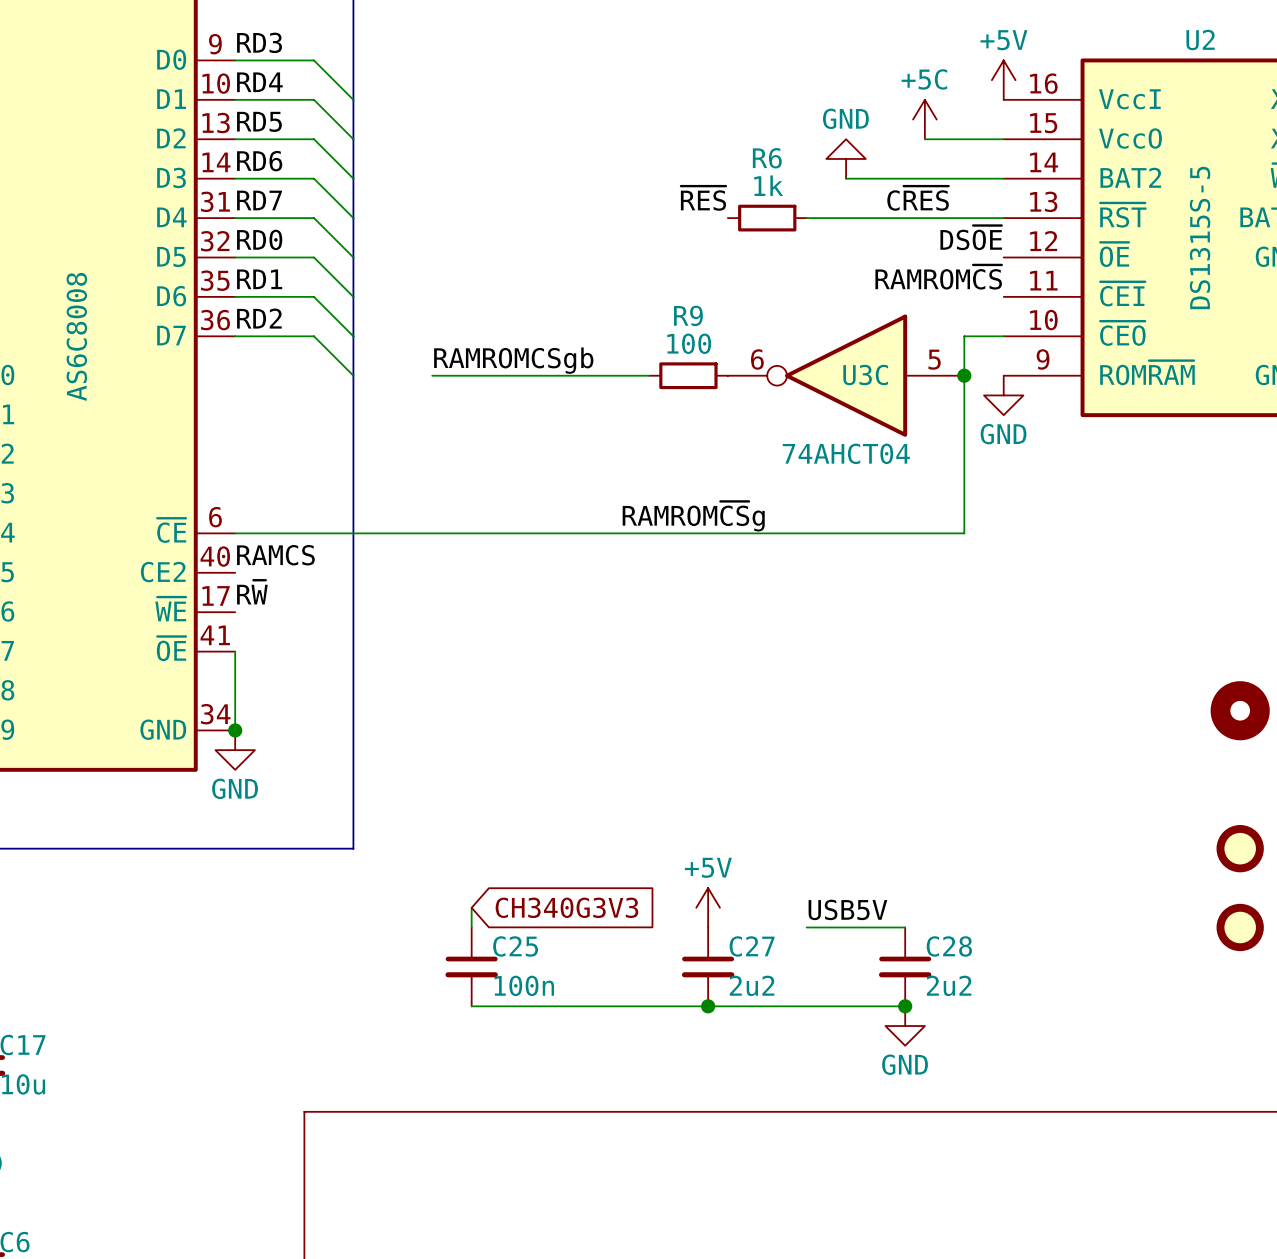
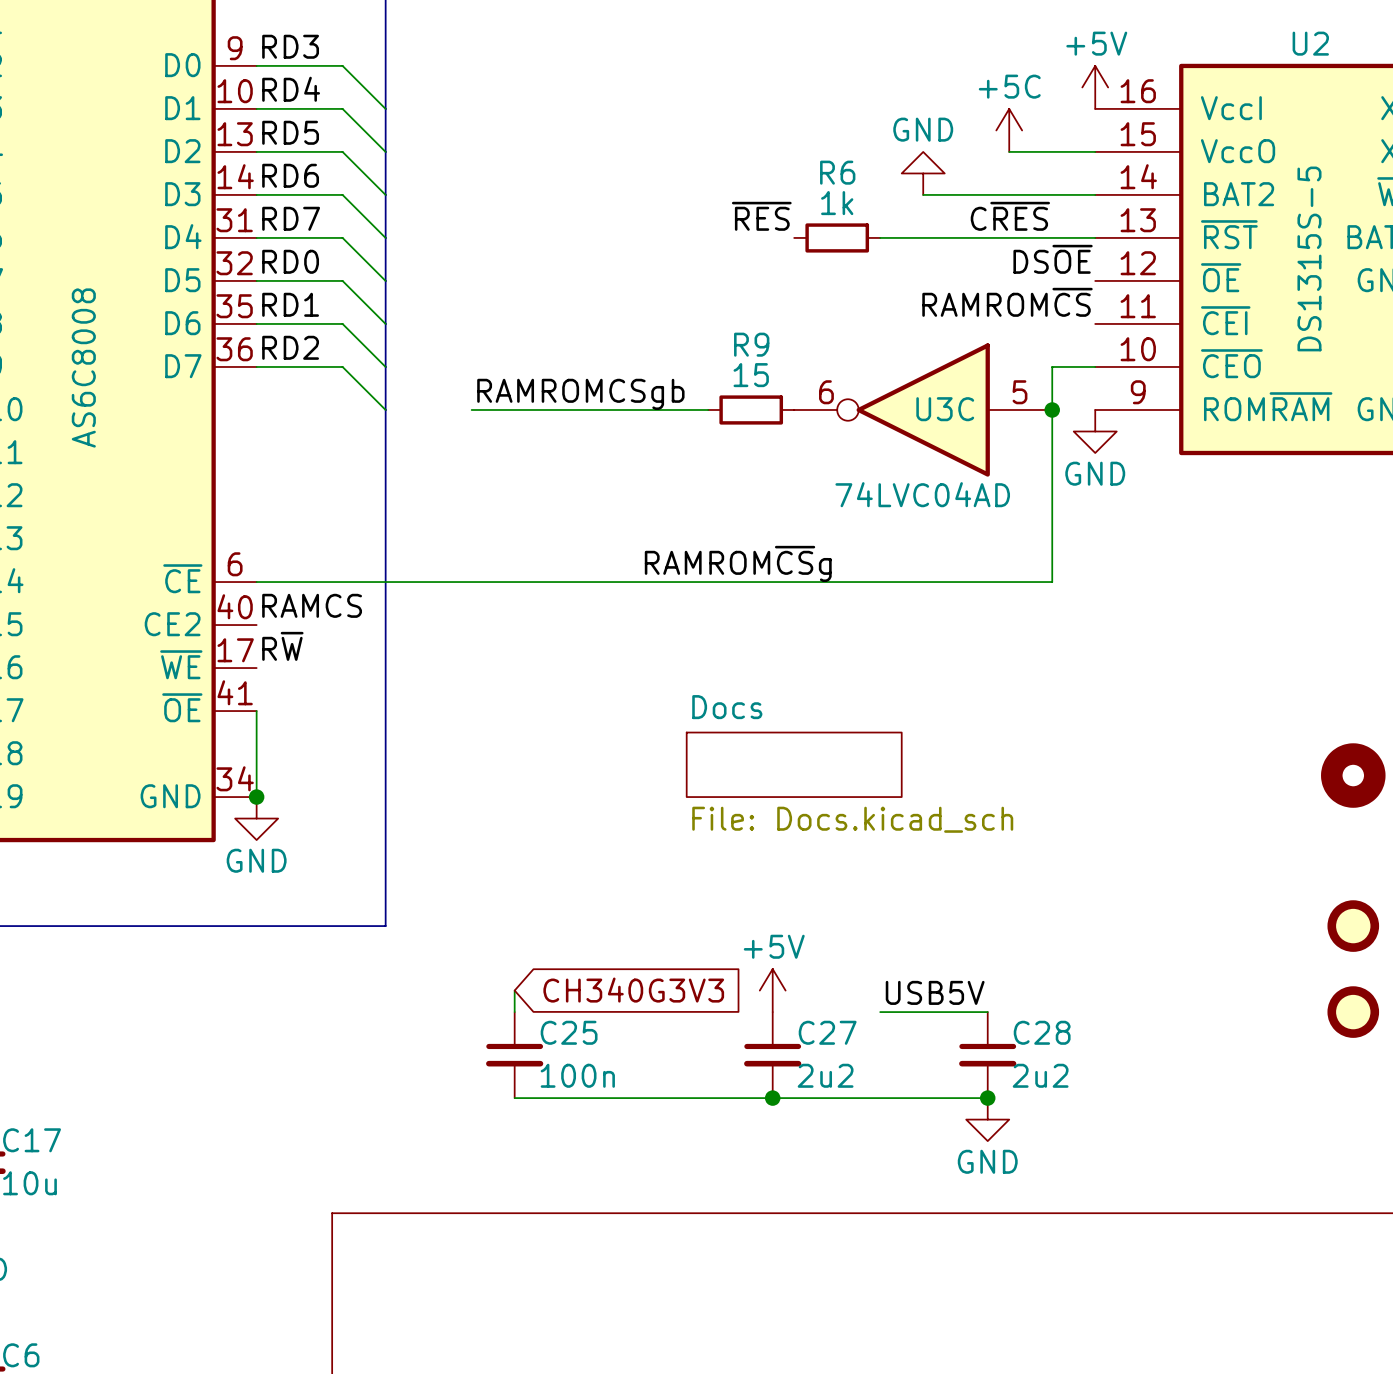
R9 value: 100 (689, 343) -> 15 (751, 375)
U3C value: 74AHCT04 (846, 453) -> 74LVC04AD (922, 494)
sheet Docs: none -> File: Docs.kicad_sch (794, 764)

